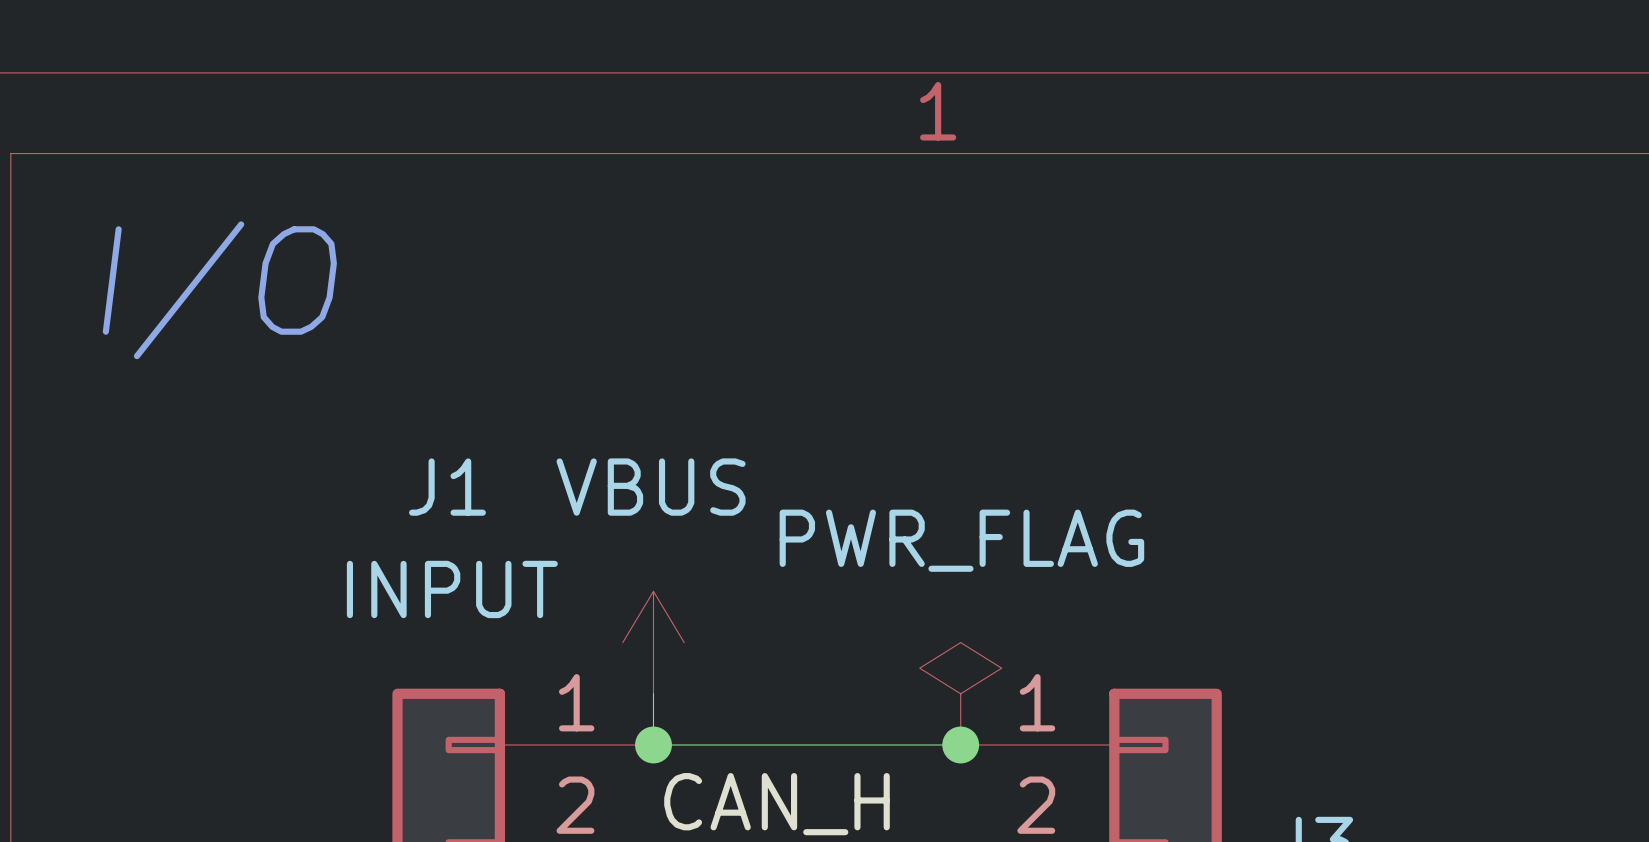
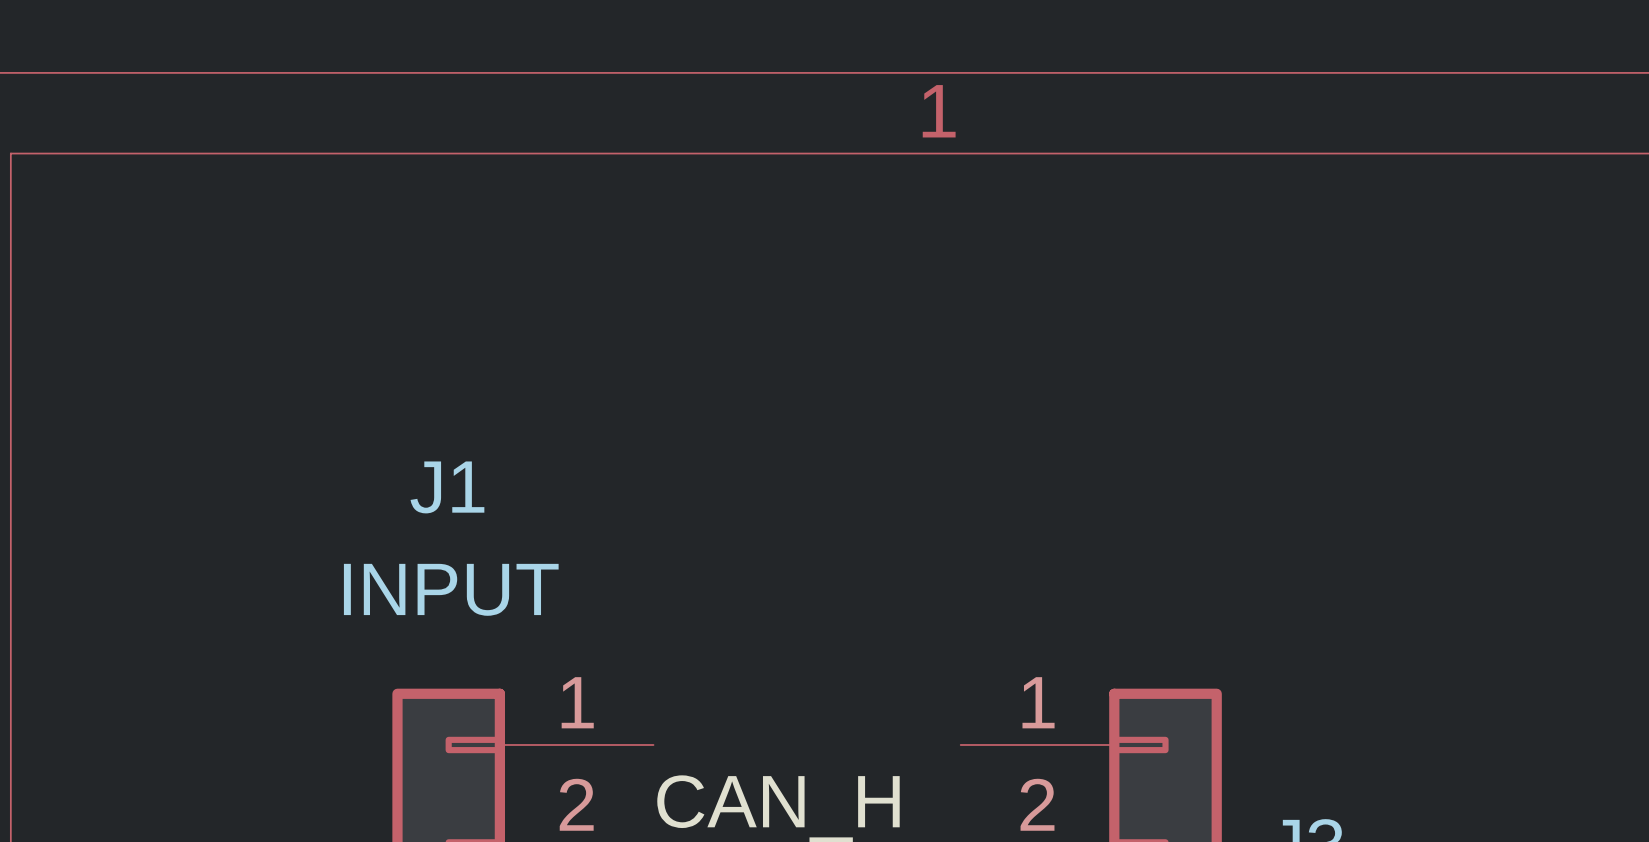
text: I/O (219, 290) -> none
power symbol: VBUS (653, 642) -> none
wire: (653, 693) (653, 744) (960, 744) -> none
power symbol: PWR_FLAG (960, 693) -> none
junction: (653, 744) -> none
junction: (960, 744) -> none

